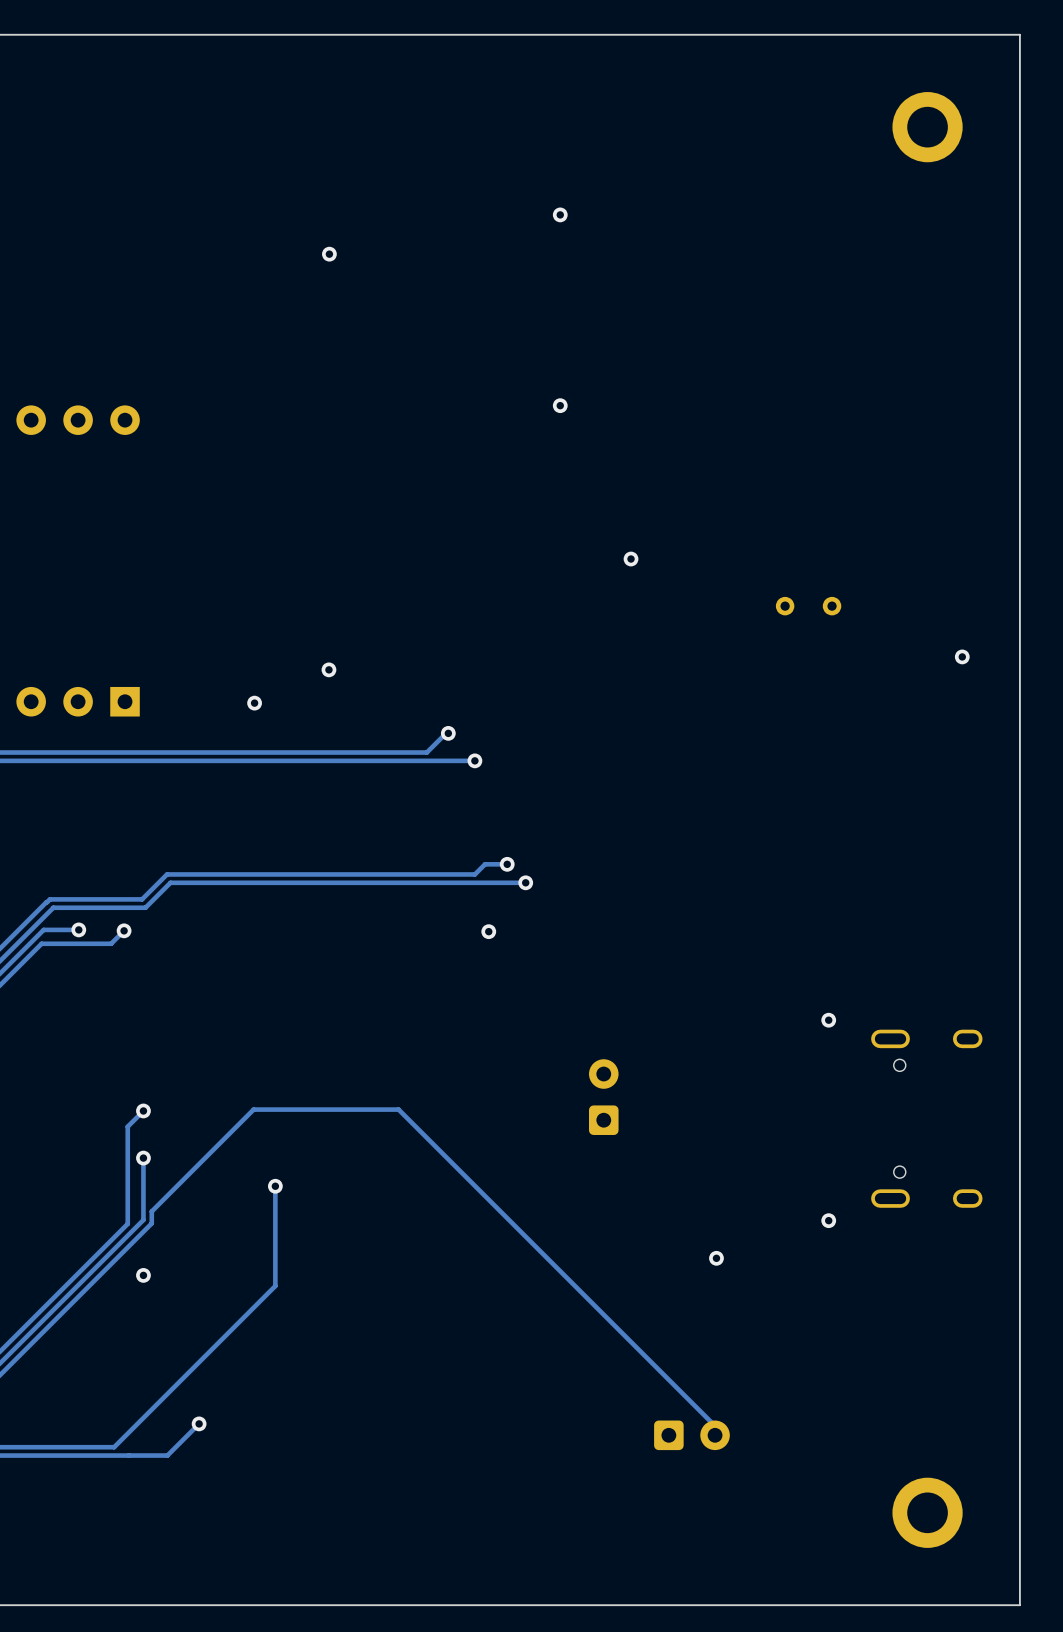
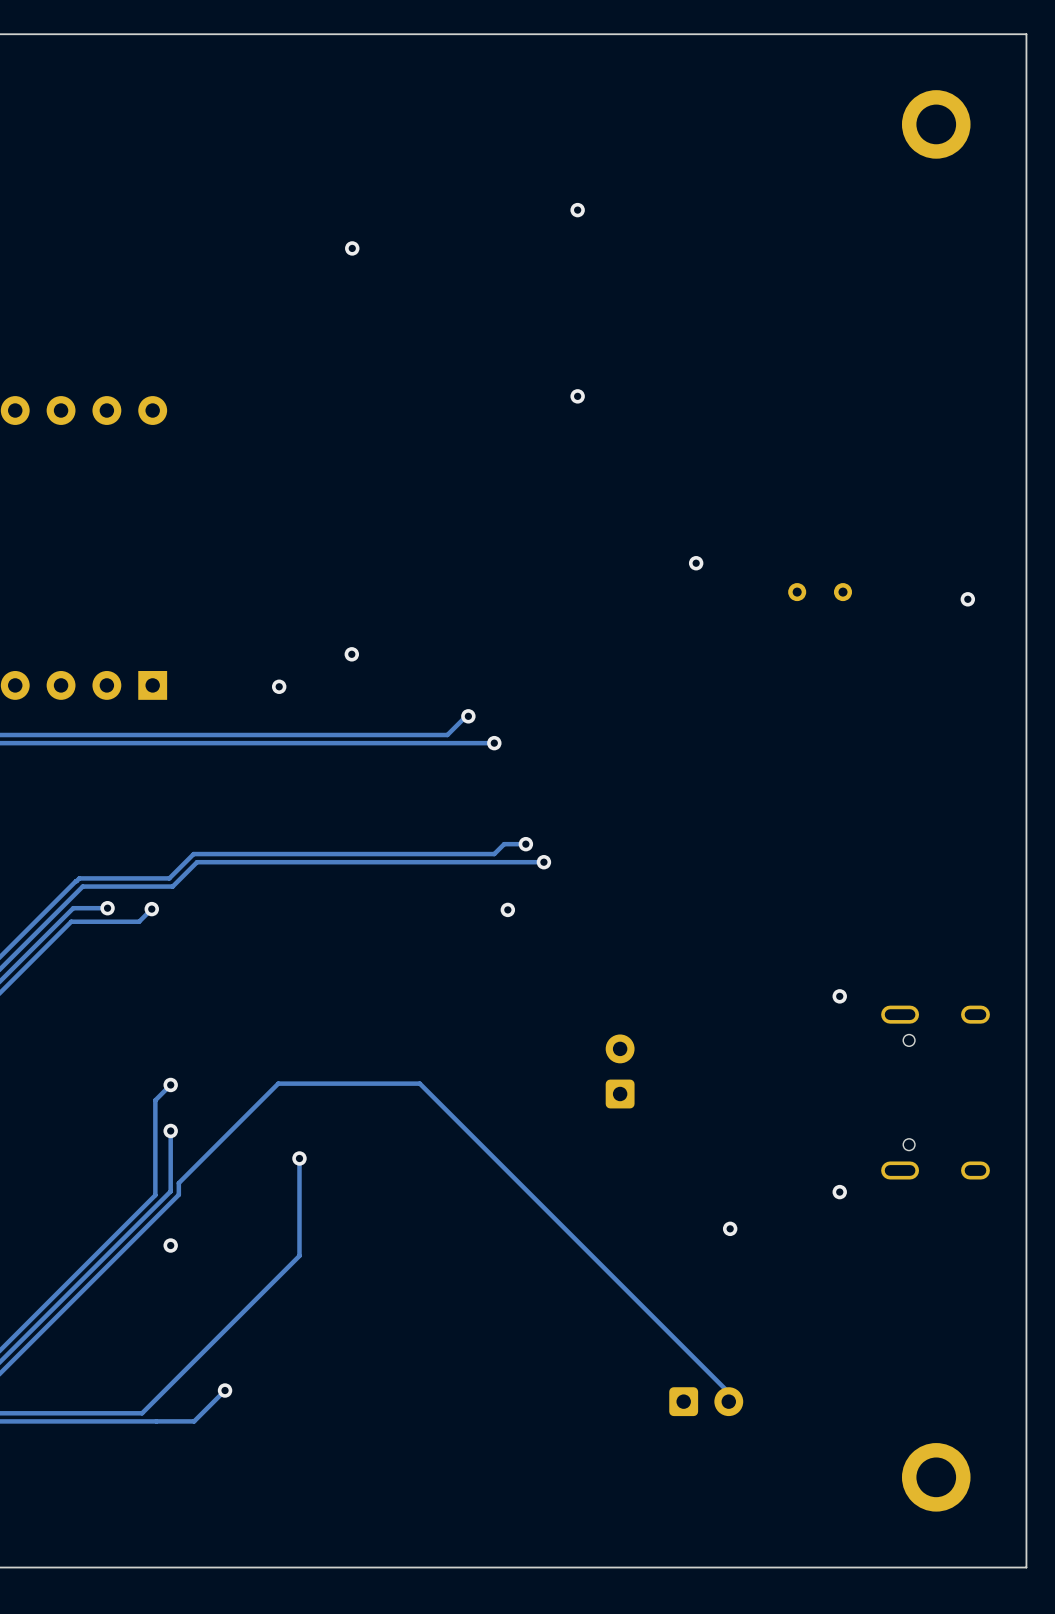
via position: (631, 559) -> (696, 563)
via position: (962, 656) -> (967, 599)

